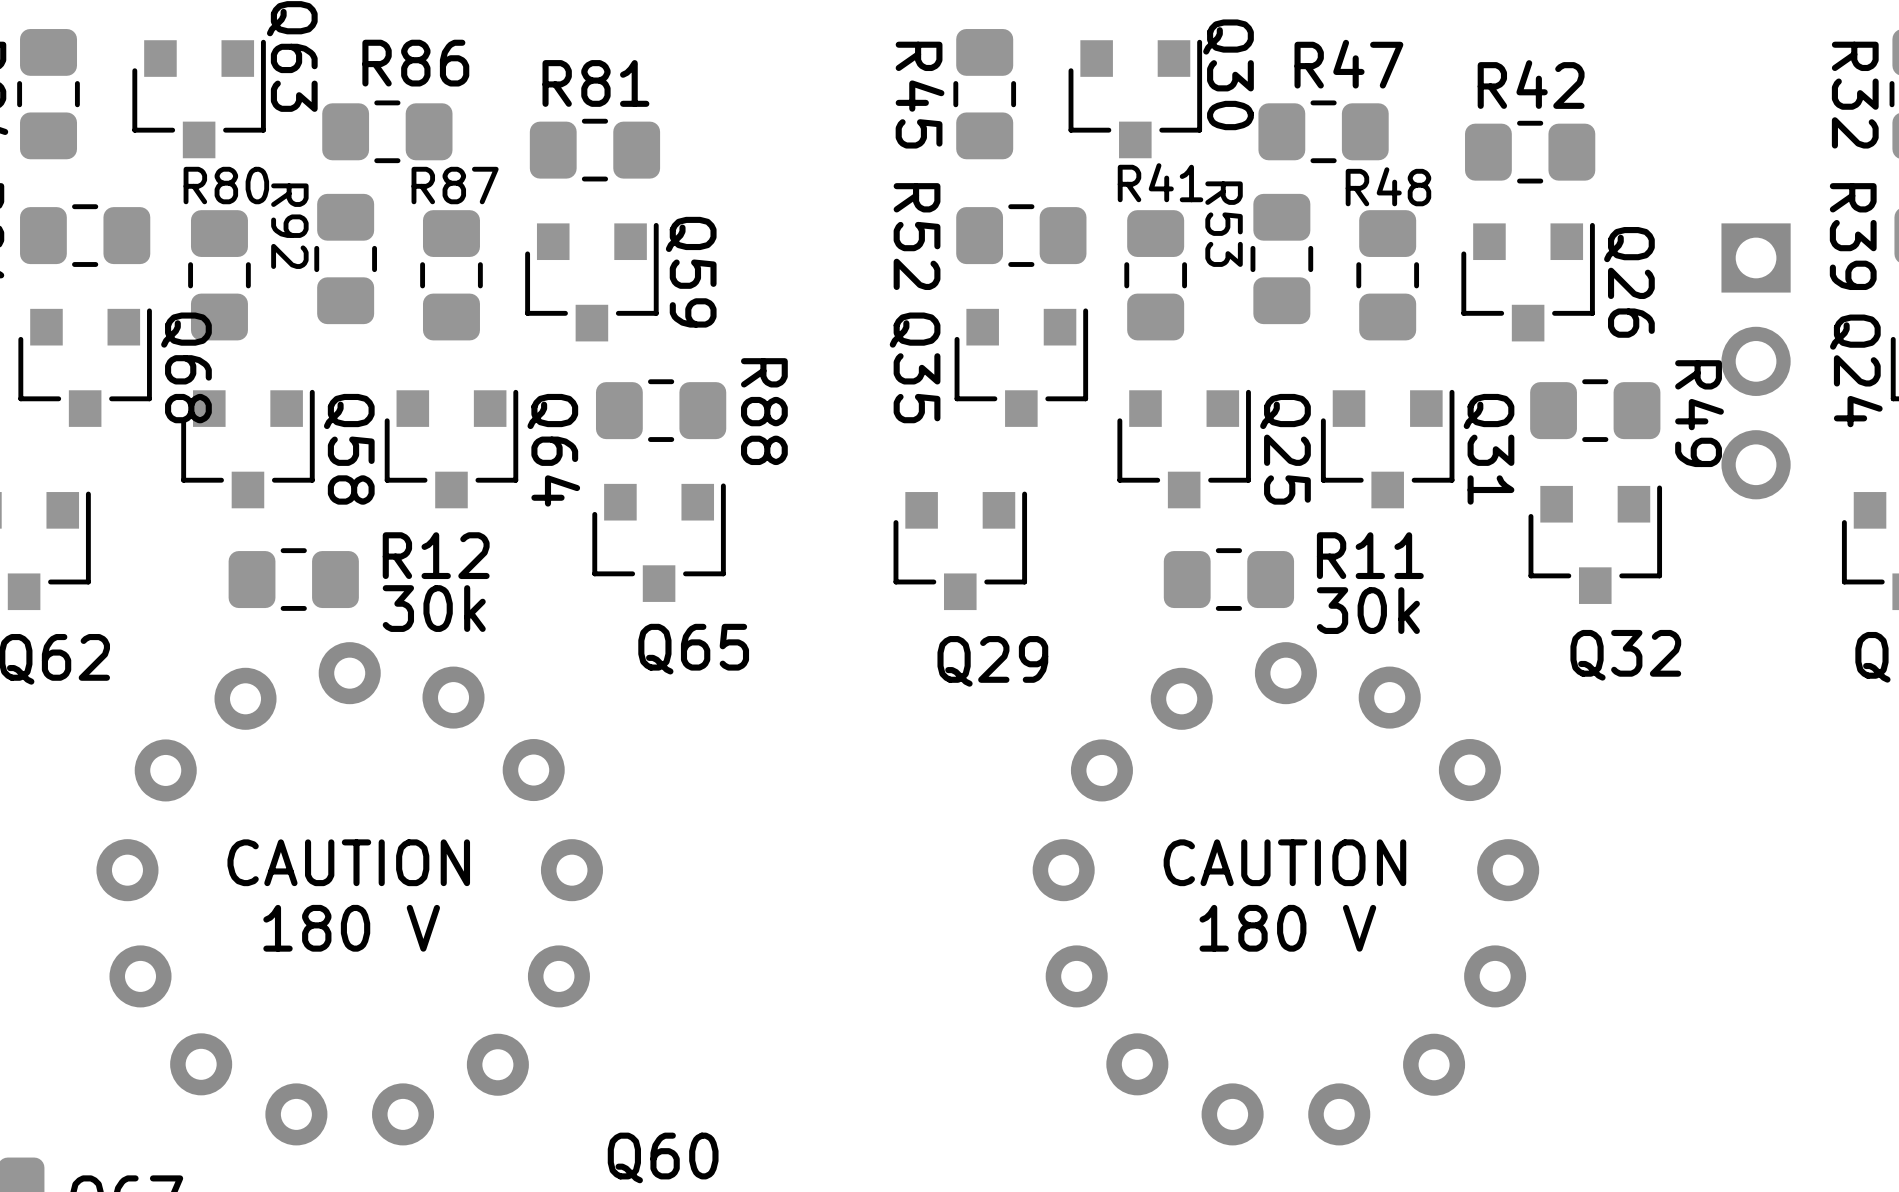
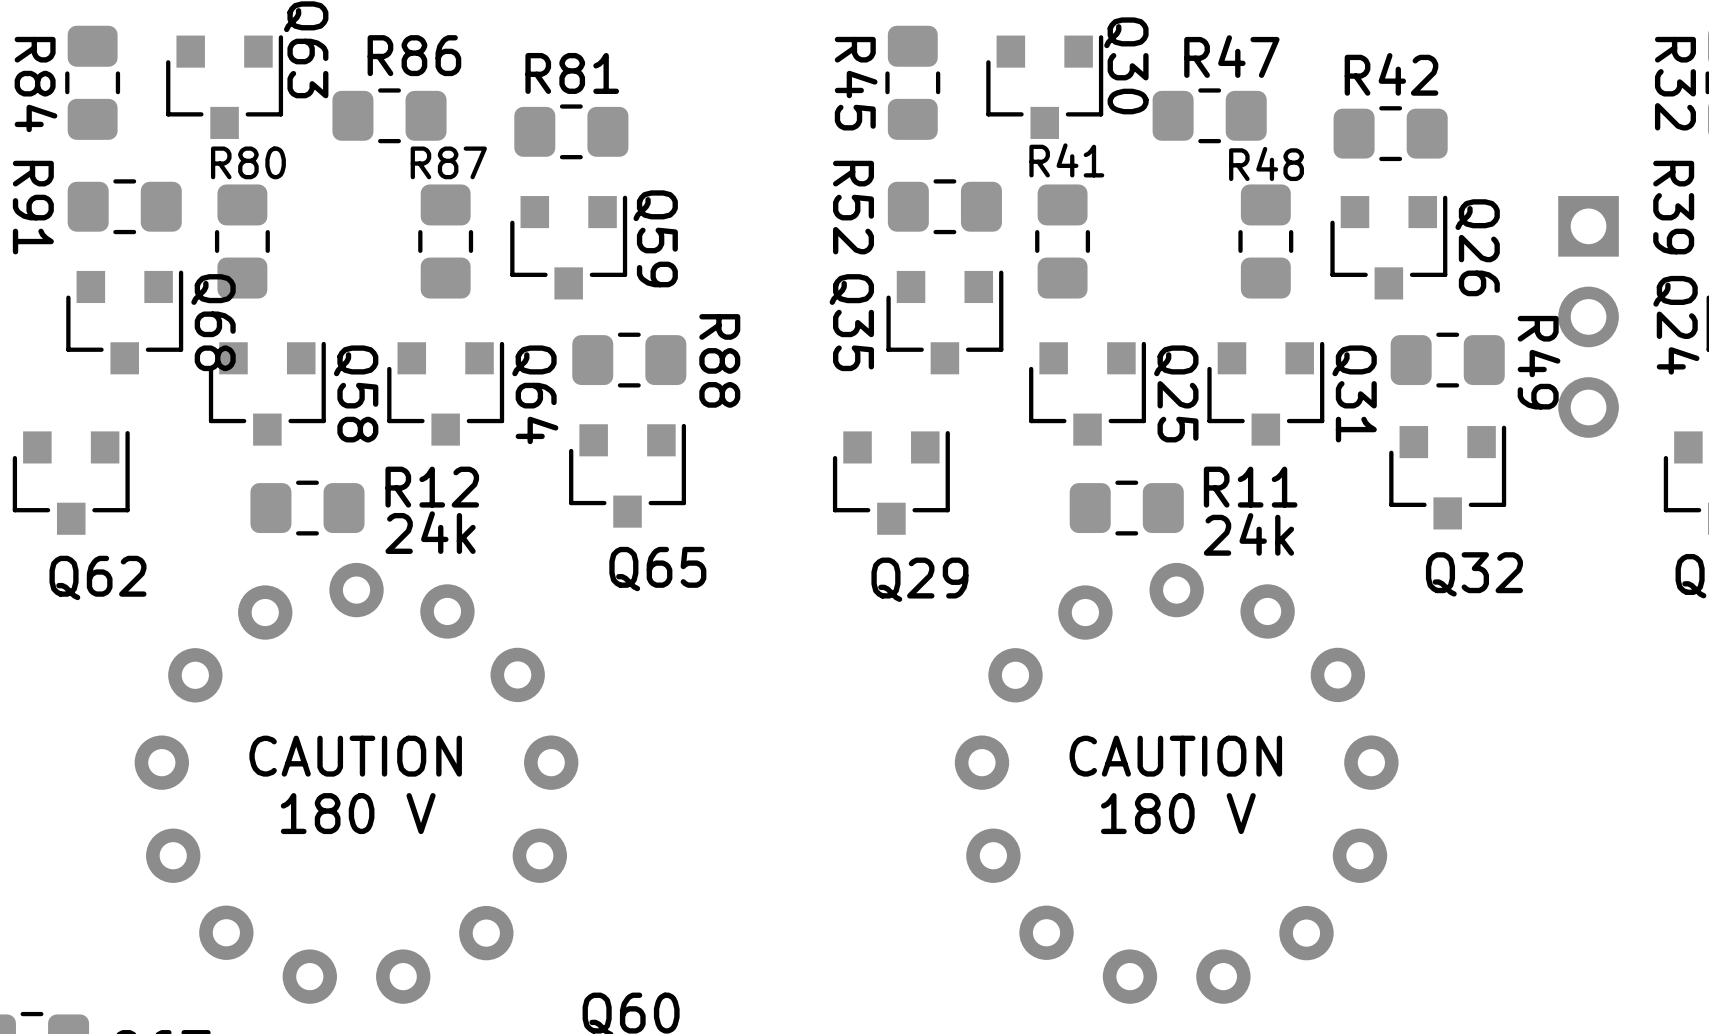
R92: (345, 258) -> none
R53: (1281, 258) -> none
R12 value: 30k (434, 608) -> 24k (430, 532)
R11 value: 30k (1368, 610) -> 24k (1248, 534)

